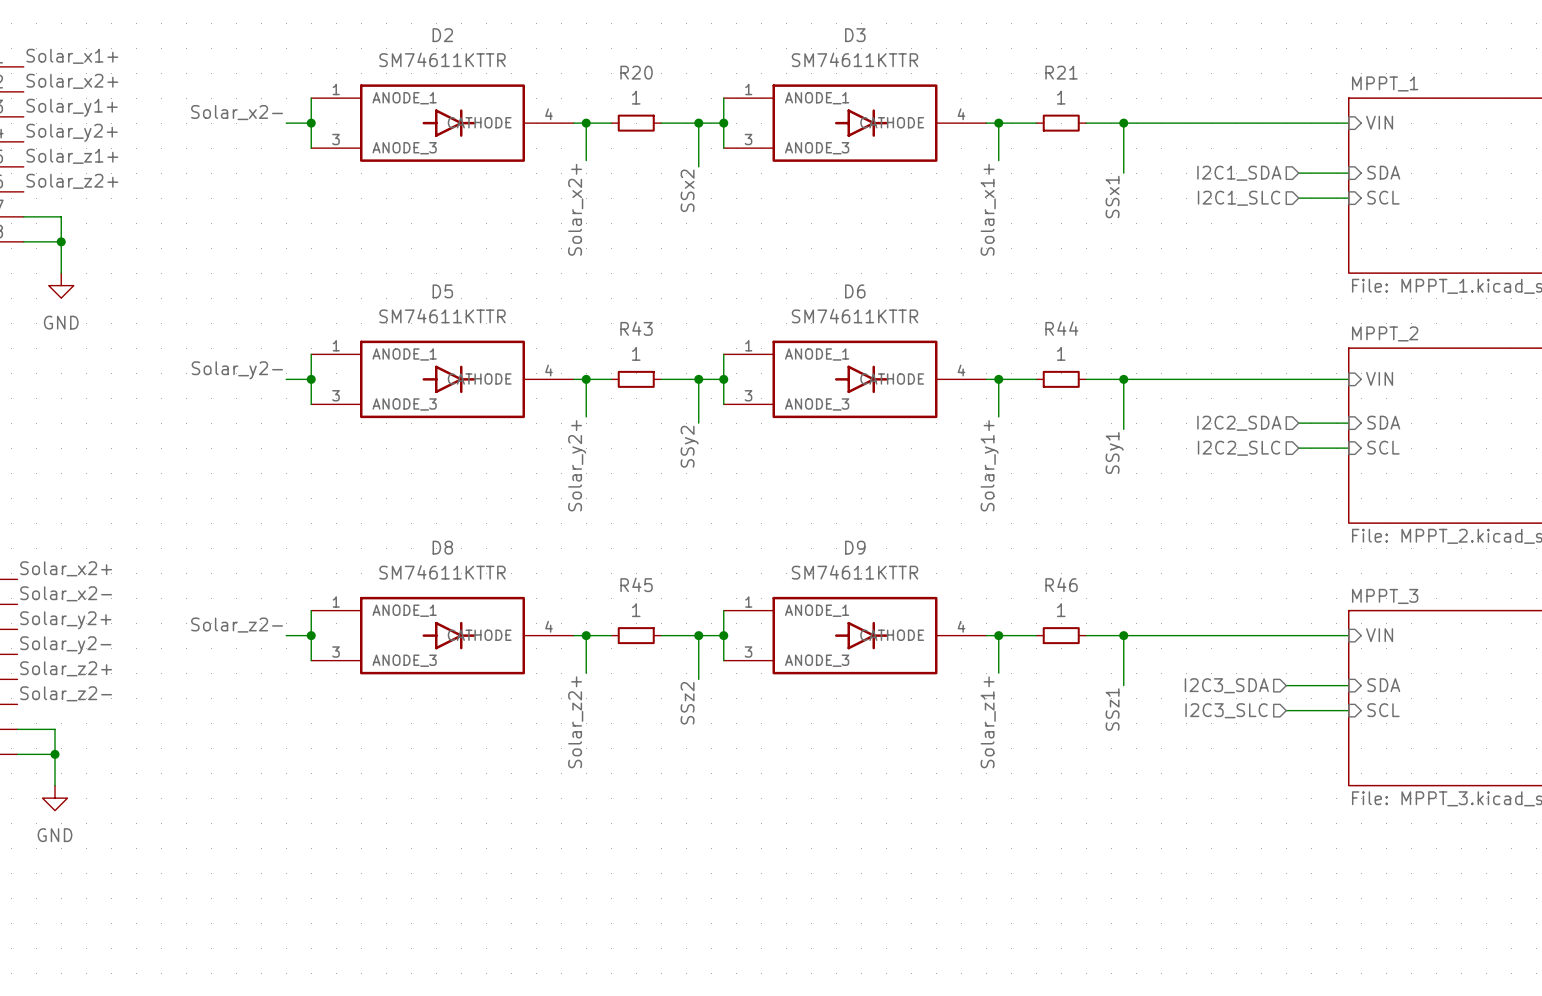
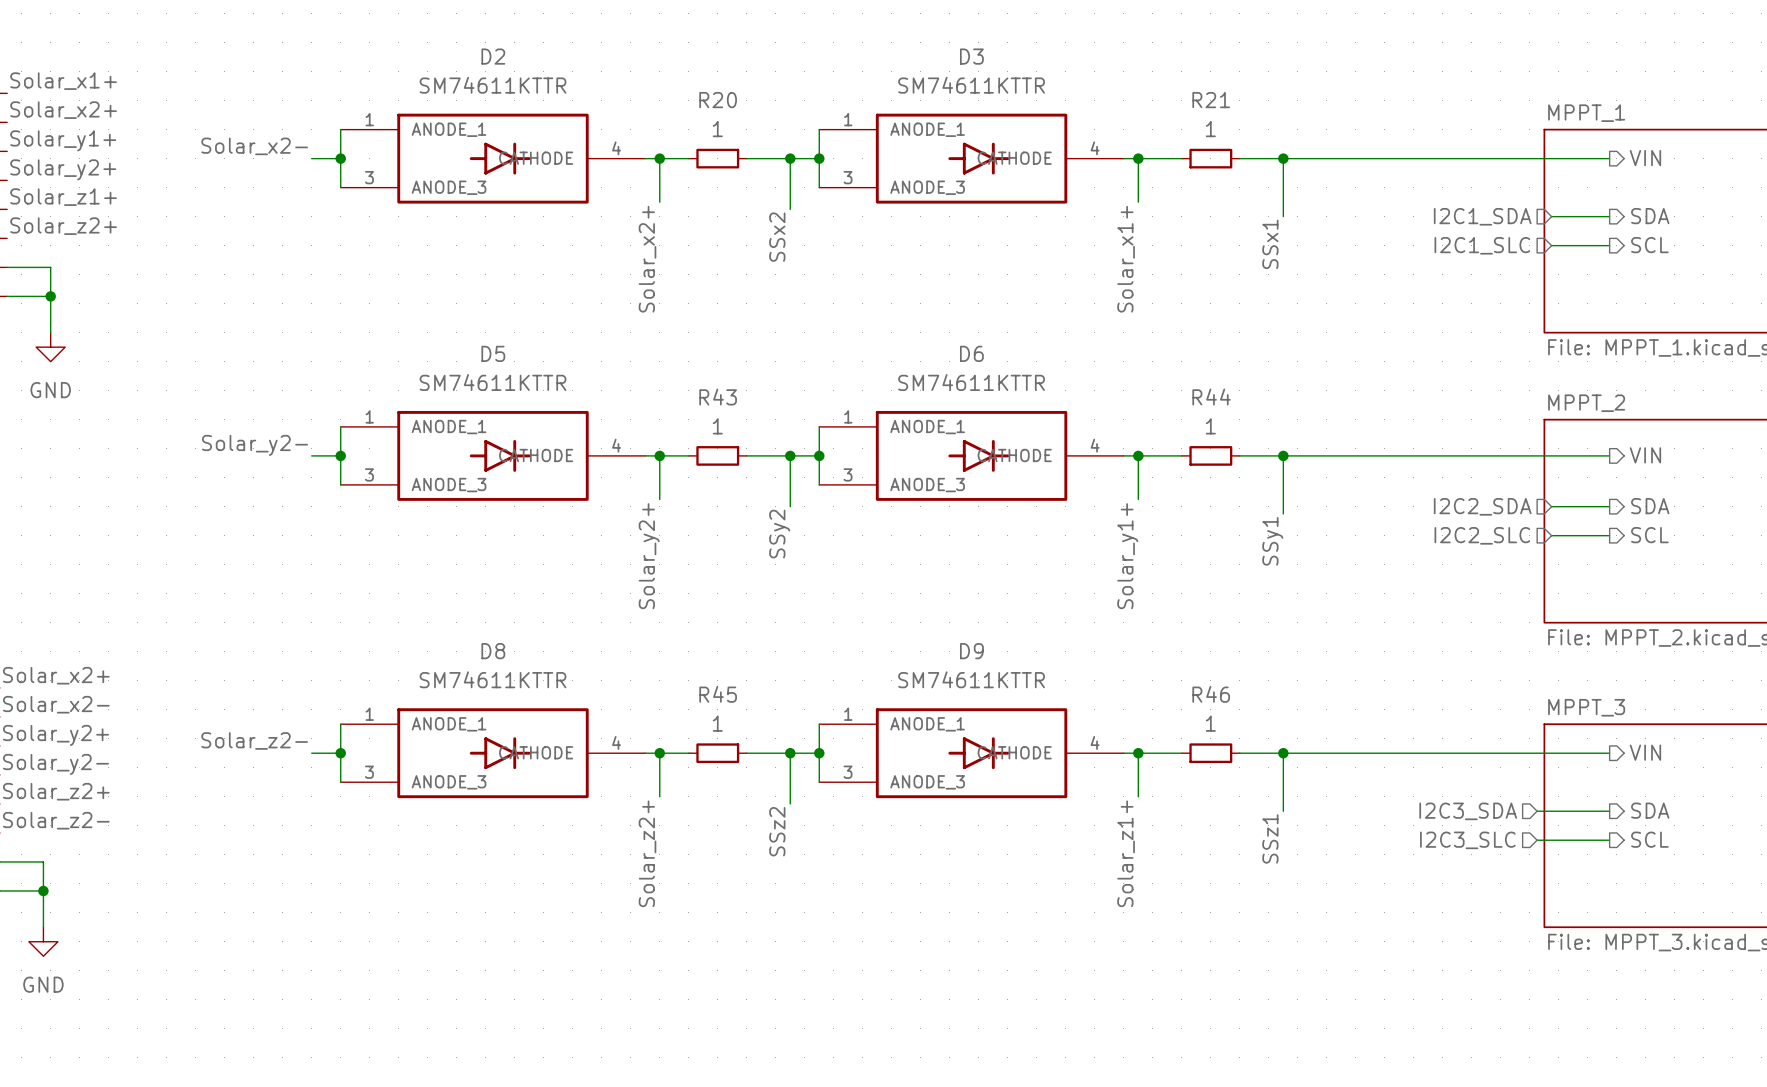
sheet pin position: VIN (1379, 122) -> VIN (1645, 158)
wire: none -> (1544, 158) (1609, 158)
sheet pin position: SDA (1383, 172) -> SDA (1650, 216)
hierarchical label position: I2C1_SDA (1239, 173) -> I2C1_SDA (1482, 216)
wire: (1298, 173) (1348, 173) -> (1551, 216) (1609, 216)
sheet pin position: SCL (1383, 197) -> SCL (1649, 245)
hierarchical label position: I2C1_SLC (1239, 198) -> I2C1_SLC (1482, 245)
wire: (1298, 198) (1348, 198) -> (1551, 245) (1609, 245)
sheet pin position: VIN (1379, 378) -> VIN (1645, 455)
wire: none -> (1544, 455) (1609, 455)
sheet pin position: SDA (1383, 422) -> SDA (1650, 506)
hierarchical label position: I2C2_SDA (1239, 423) -> I2C2_SDA (1482, 506)
wire: (1298, 423) (1348, 423) -> (1551, 506) (1609, 506)
sheet pin position: SCL (1383, 447) -> SCL (1649, 535)
hierarchical label position: I2C2_SLC (1239, 448) -> I2C2_SLC (1482, 535)
wire: (1298, 448) (1348, 448) -> (1551, 535) (1609, 535)
wire: none -> (1544, 753) (1609, 753)
sheet pin position: VIN (1379, 635) -> VIN (1645, 752)
hierarchical label position: I2C3_SDA (1226, 685) -> I2C3_SDA (1468, 811)
wire: (1286, 685) (1342, 685) -> (1544, 811) (1609, 811)
sheet pin position: SDA (1383, 685) -> SDA (1650, 810)
hierarchical label position: I2C3_SLC (1226, 710) -> I2C3_SLC (1467, 840)
wire: (1286, 710) (1342, 710) -> (1544, 840) (1609, 840)
sheet pin position: SCL (1383, 710) -> SCL (1649, 839)

